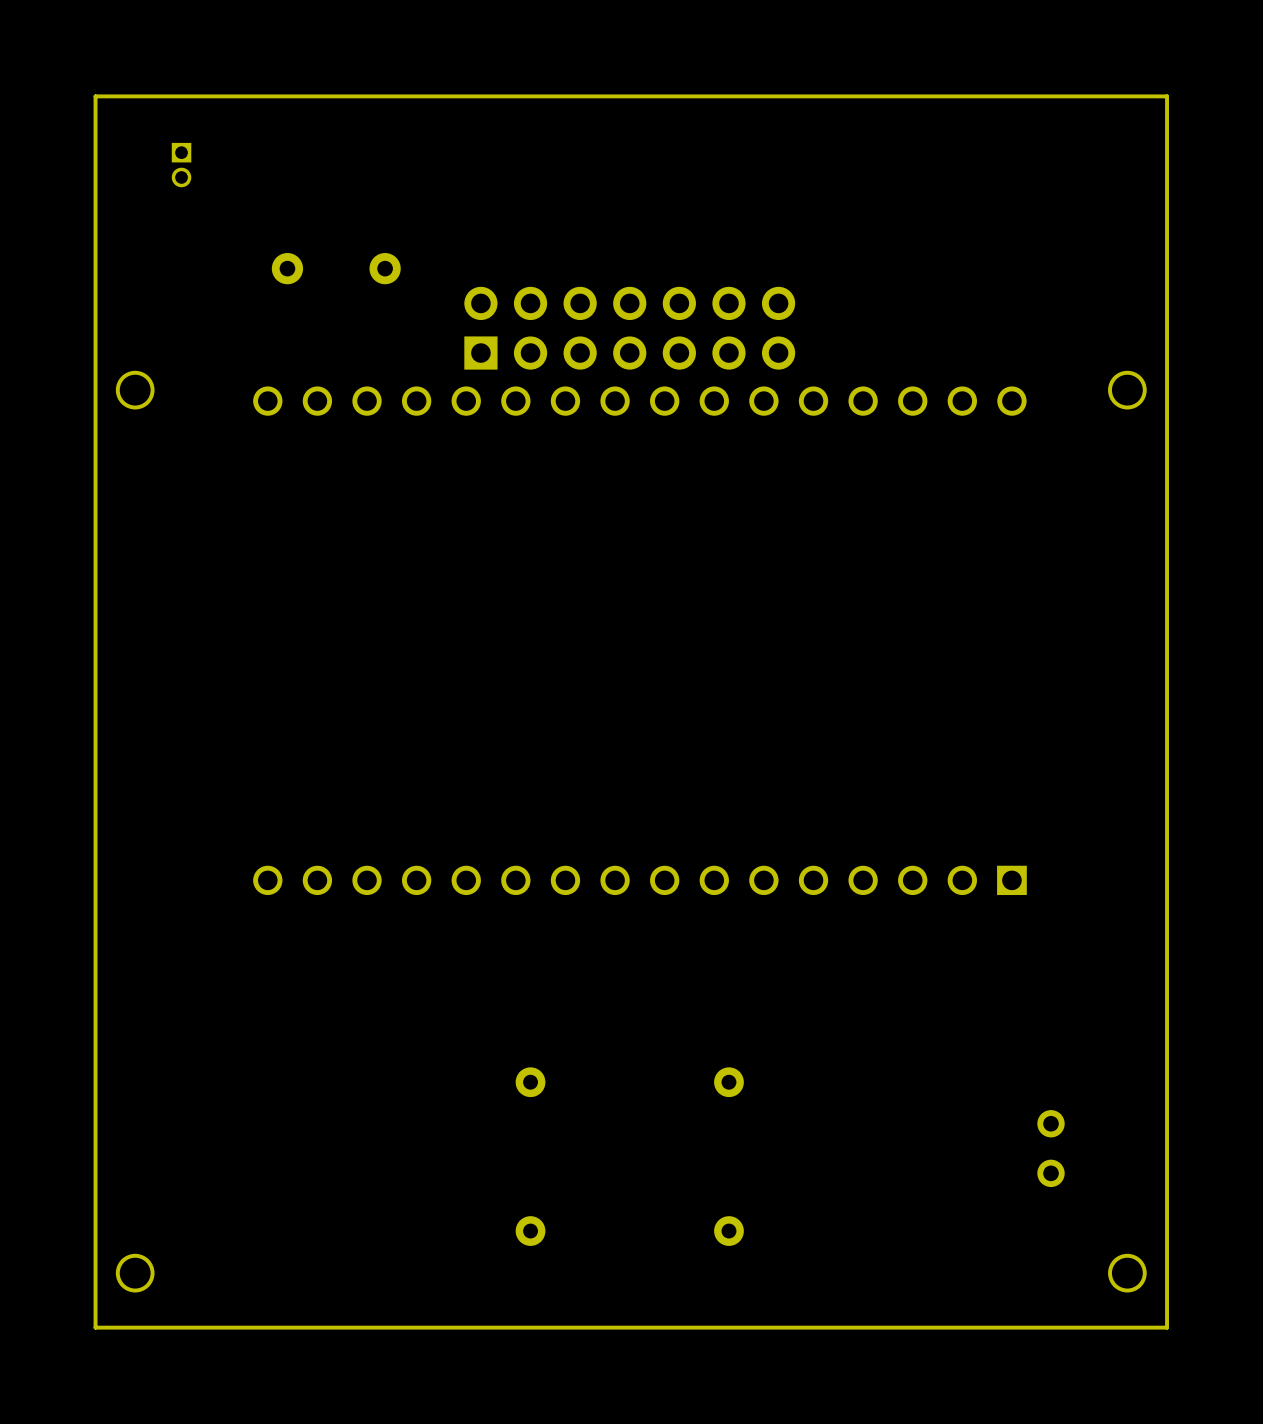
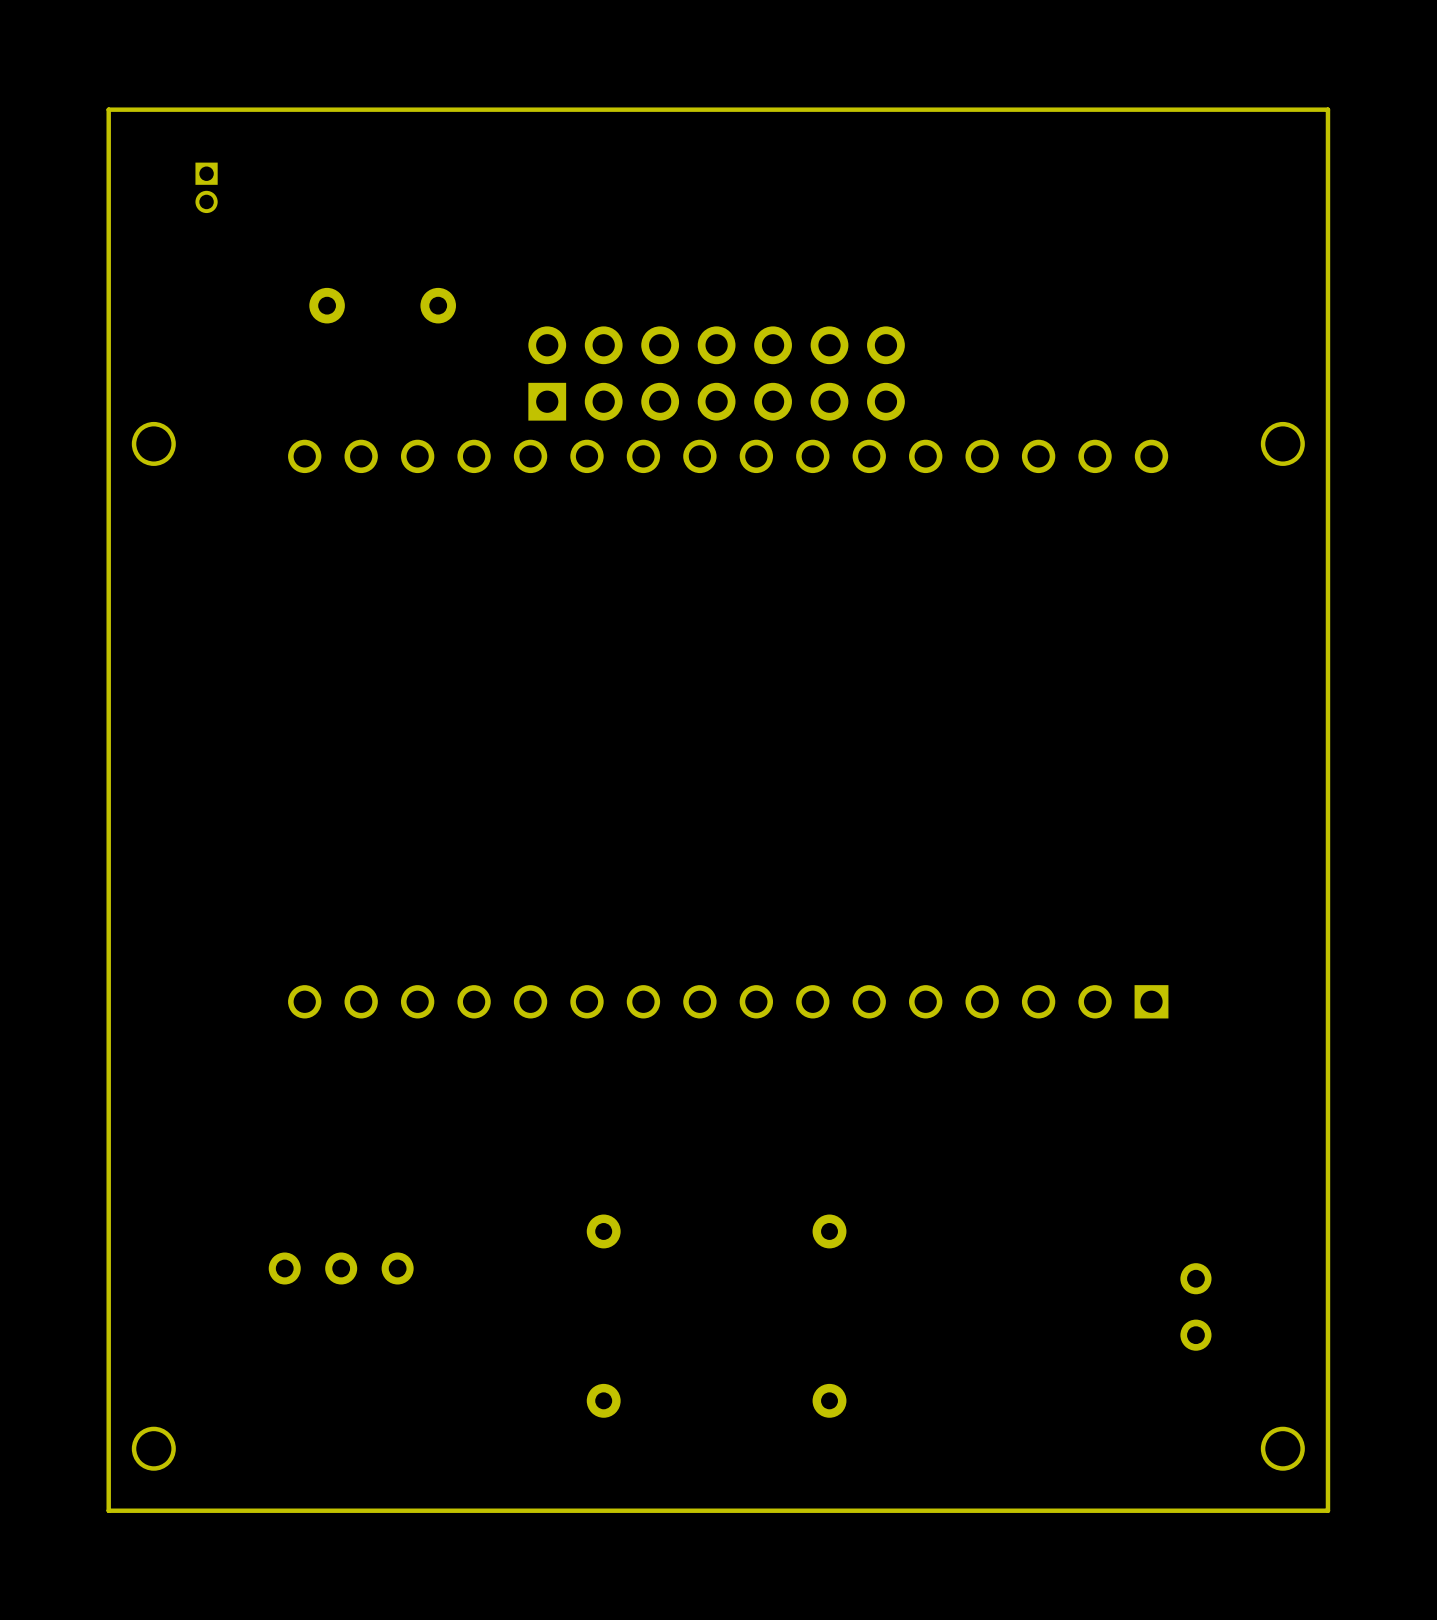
part: none -> (341, 1268)

